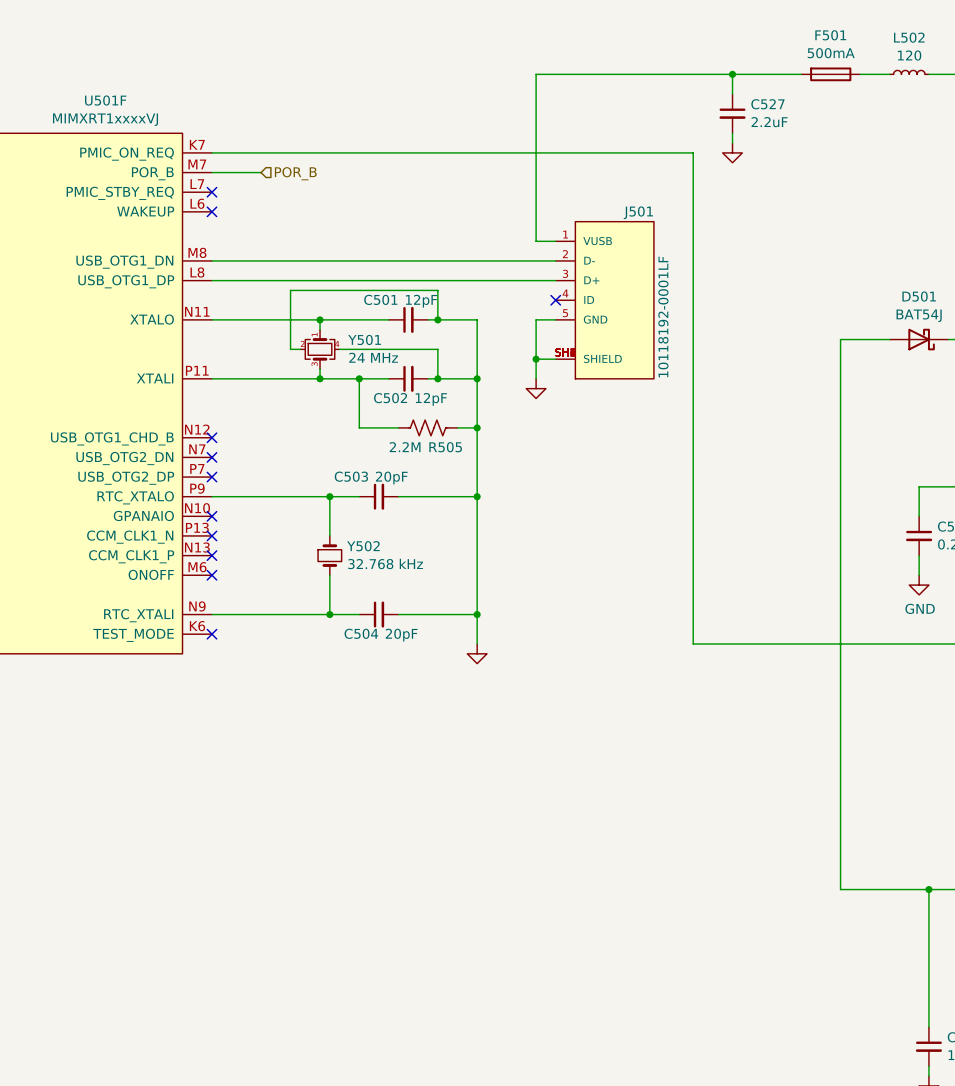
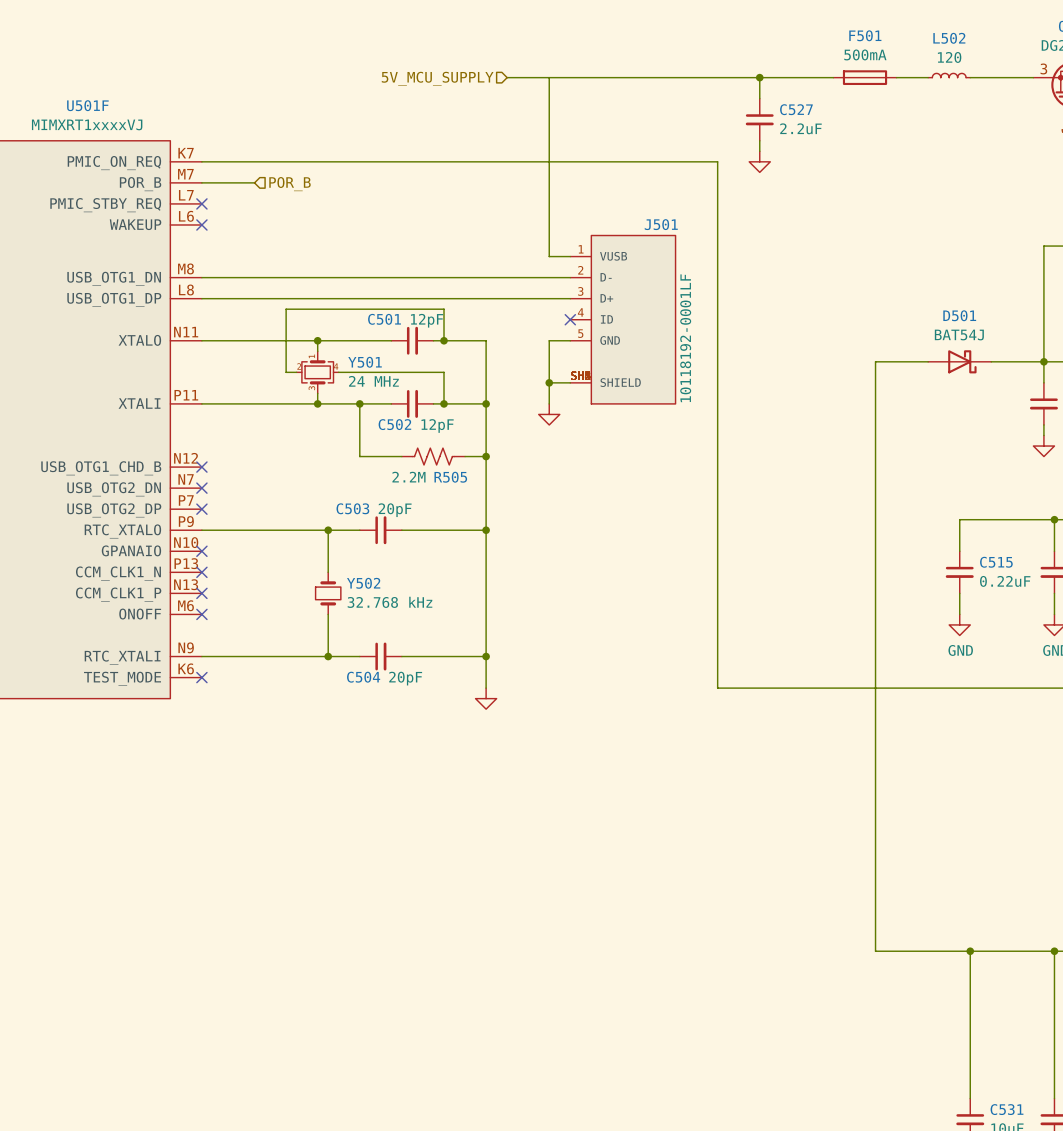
wire: none -> (507, 77) (549, 77)
hierarchical label: none -> 5V_MCU_SUPPLY (437, 78)

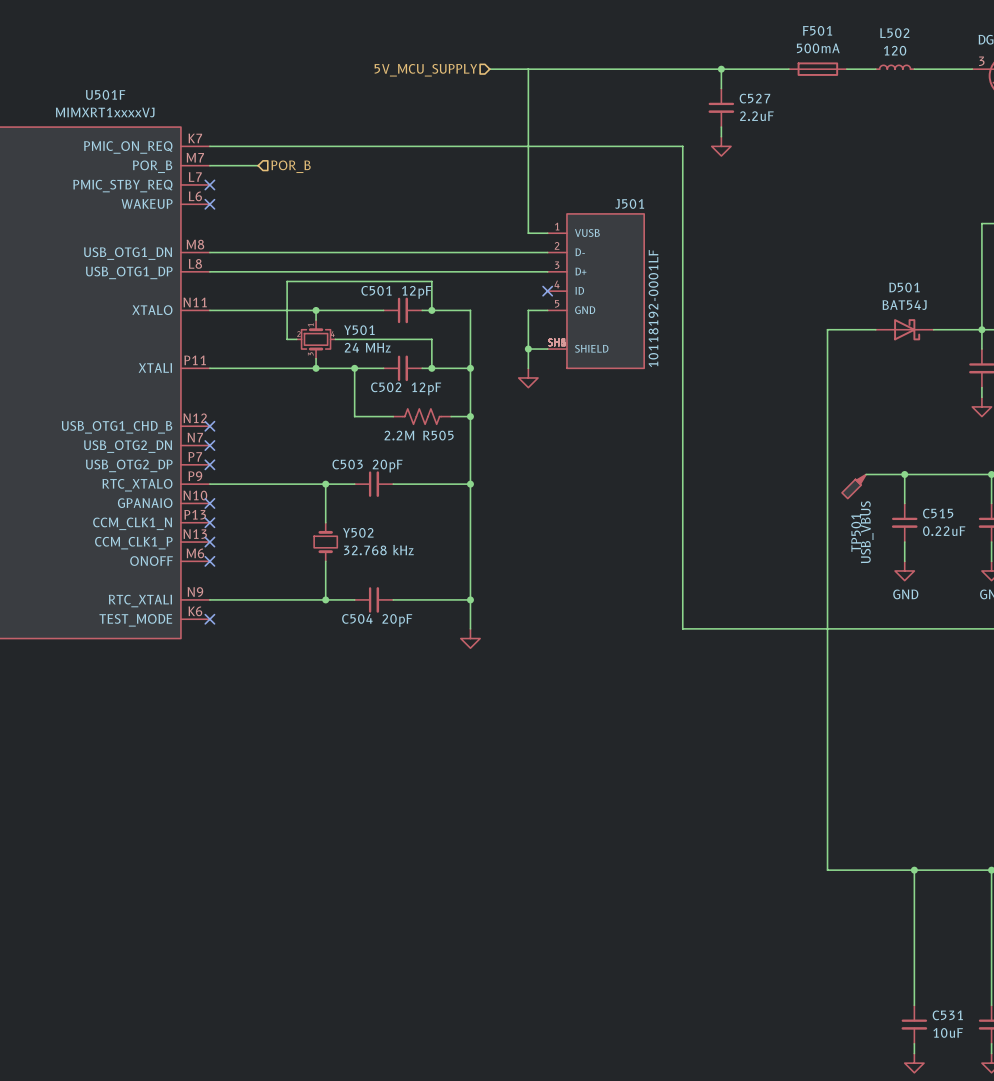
wire: none -> (866, 474) (904, 474)
junction: none -> (904, 474)
TP501: none -> USB_VBUS (854, 486)

